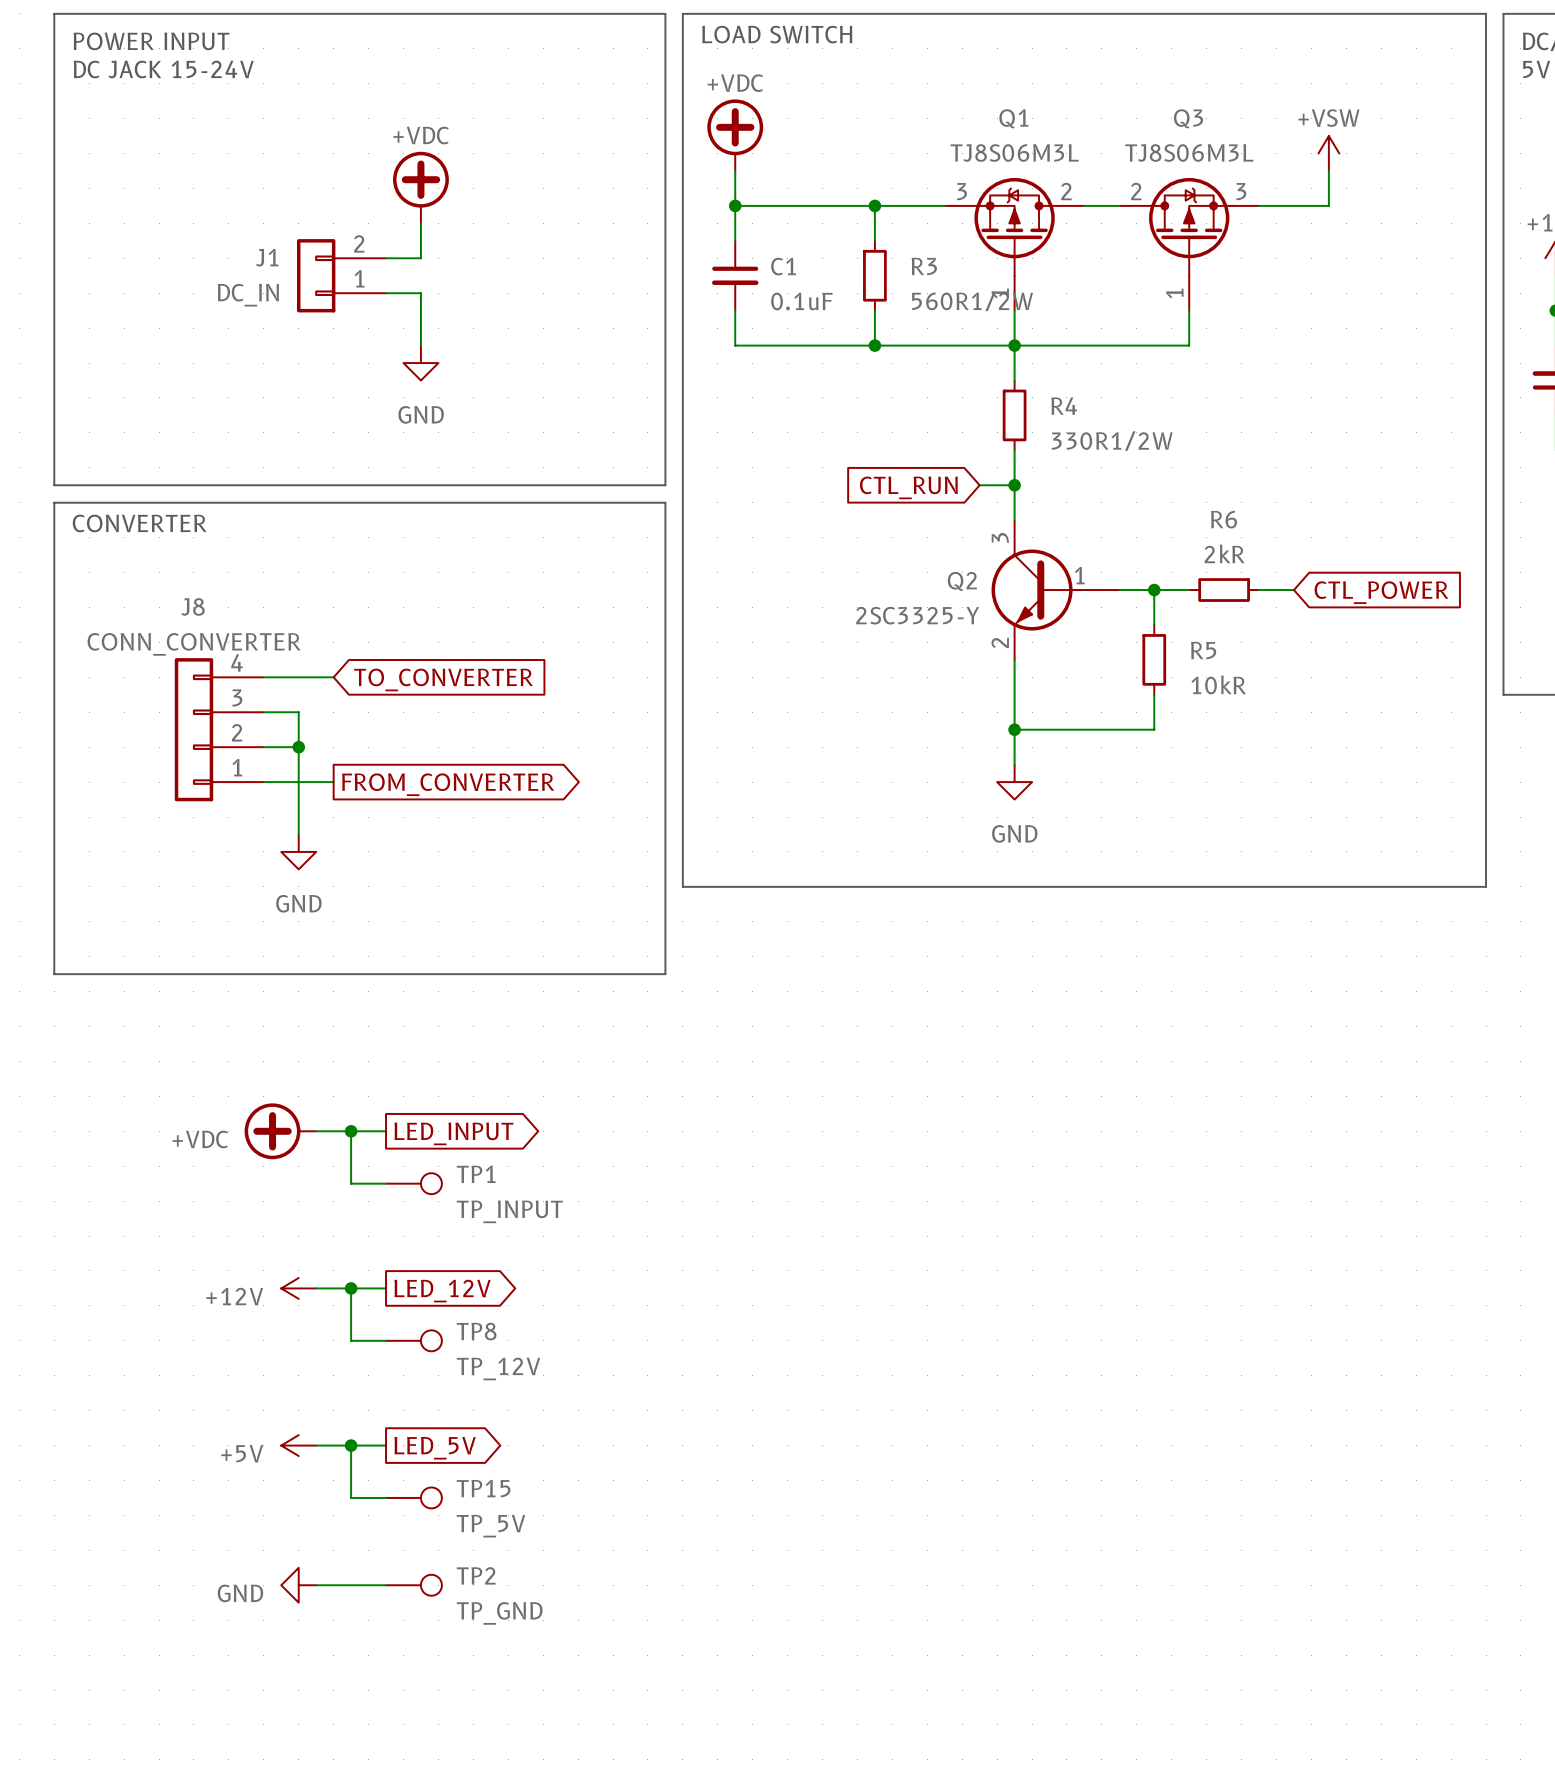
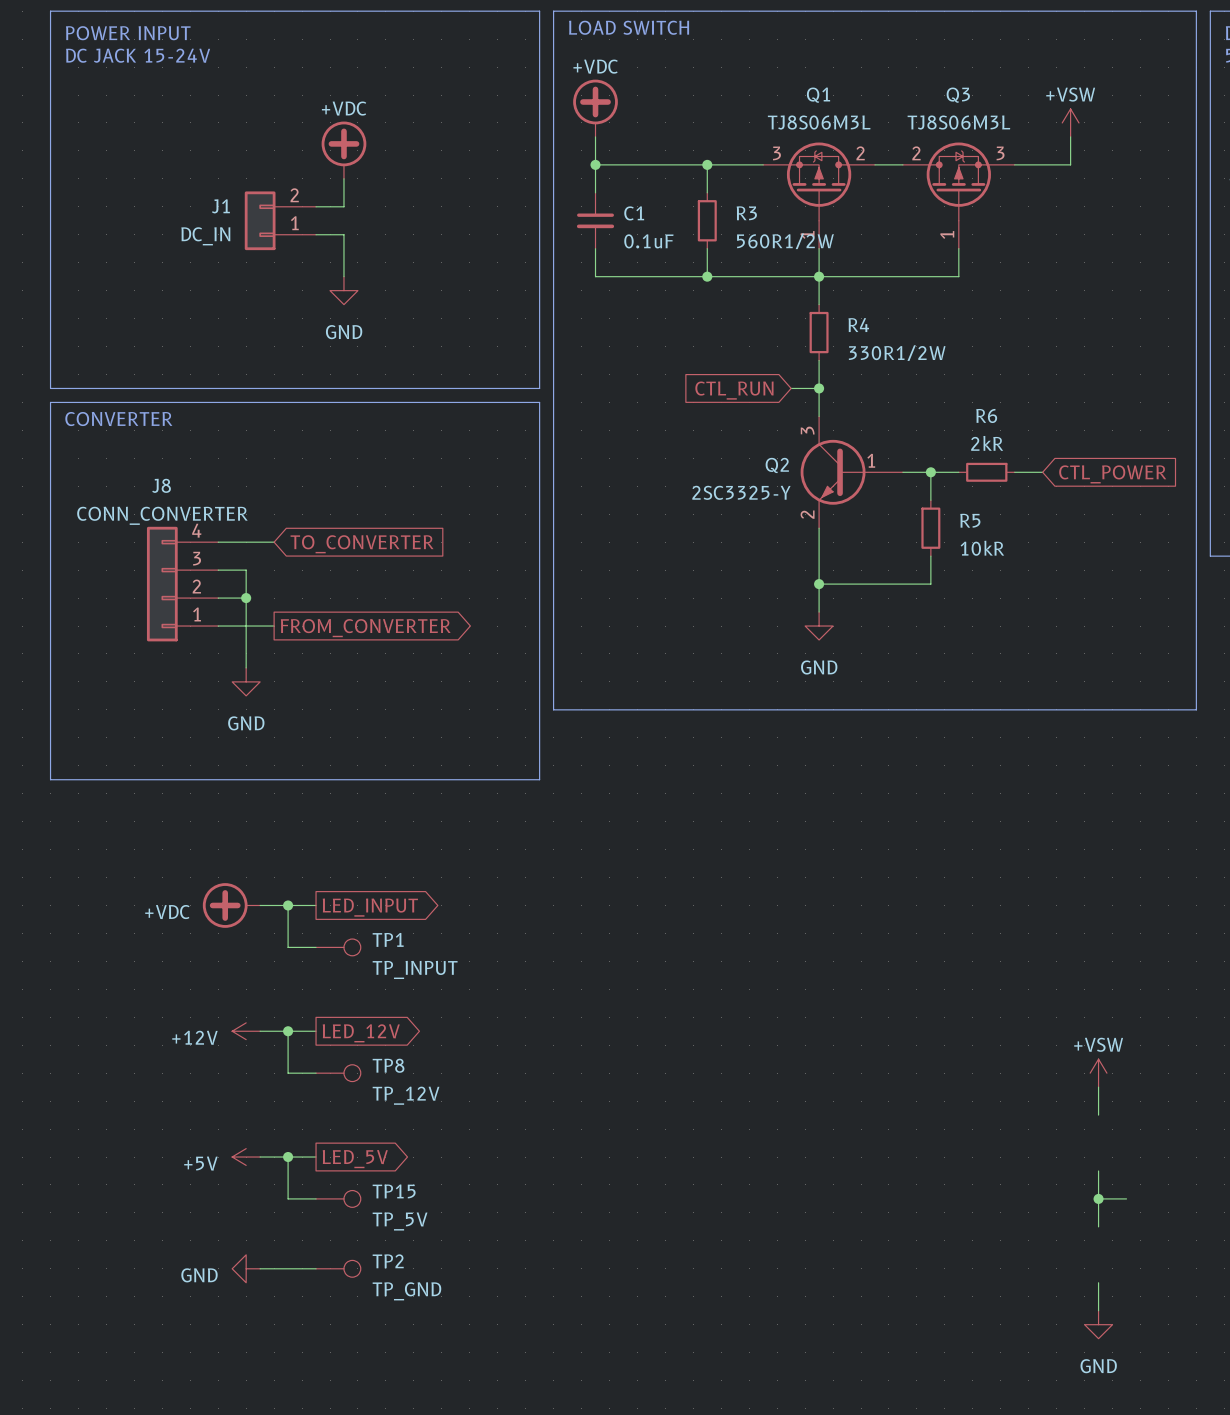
power symbol: none -> +VSW (1098, 1073)
wire: none -> (1098, 1087) (1098, 1115)
wire: none -> (1098, 1170) (1098, 1226)
wire: none -> (1098, 1198) (1126, 1198)
junction: none -> (1098, 1198)
wire: none -> (1098, 1282) (1098, 1310)
power symbol: none -> GND (1098, 1324)

